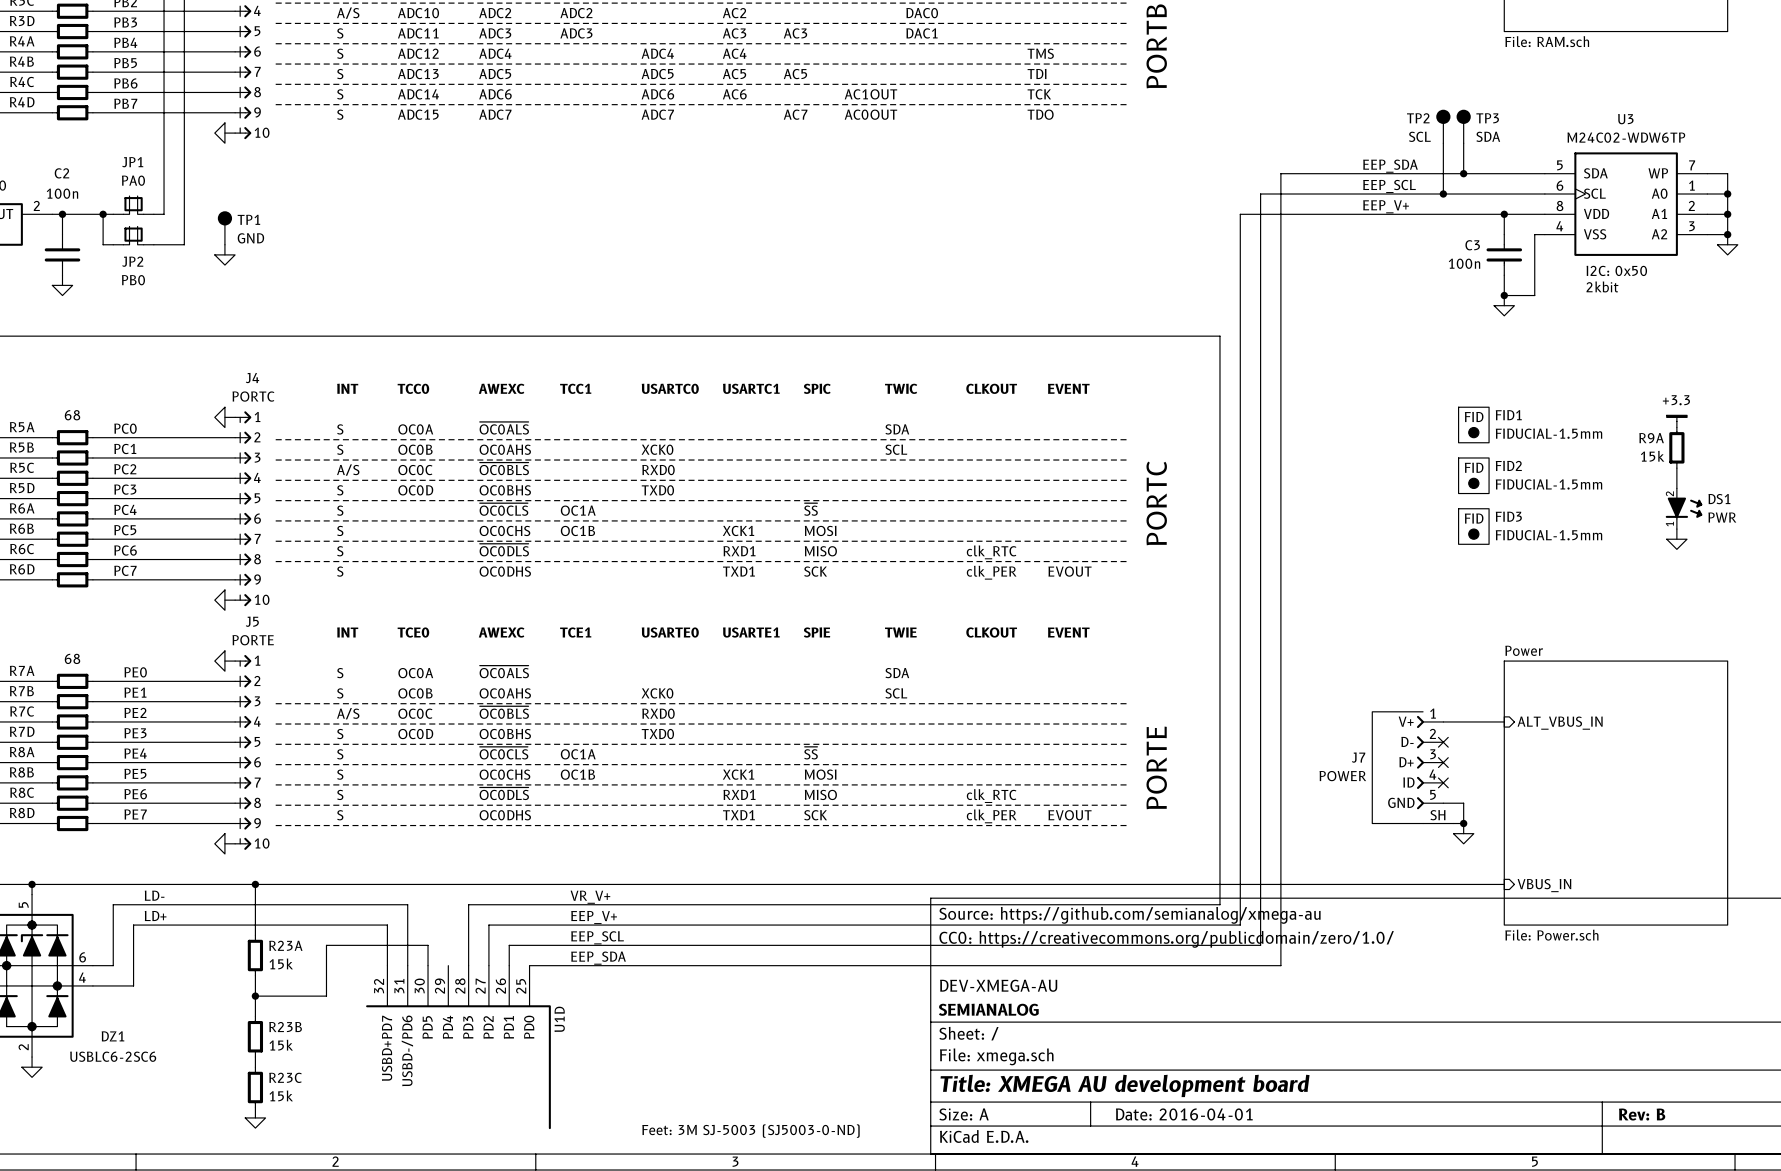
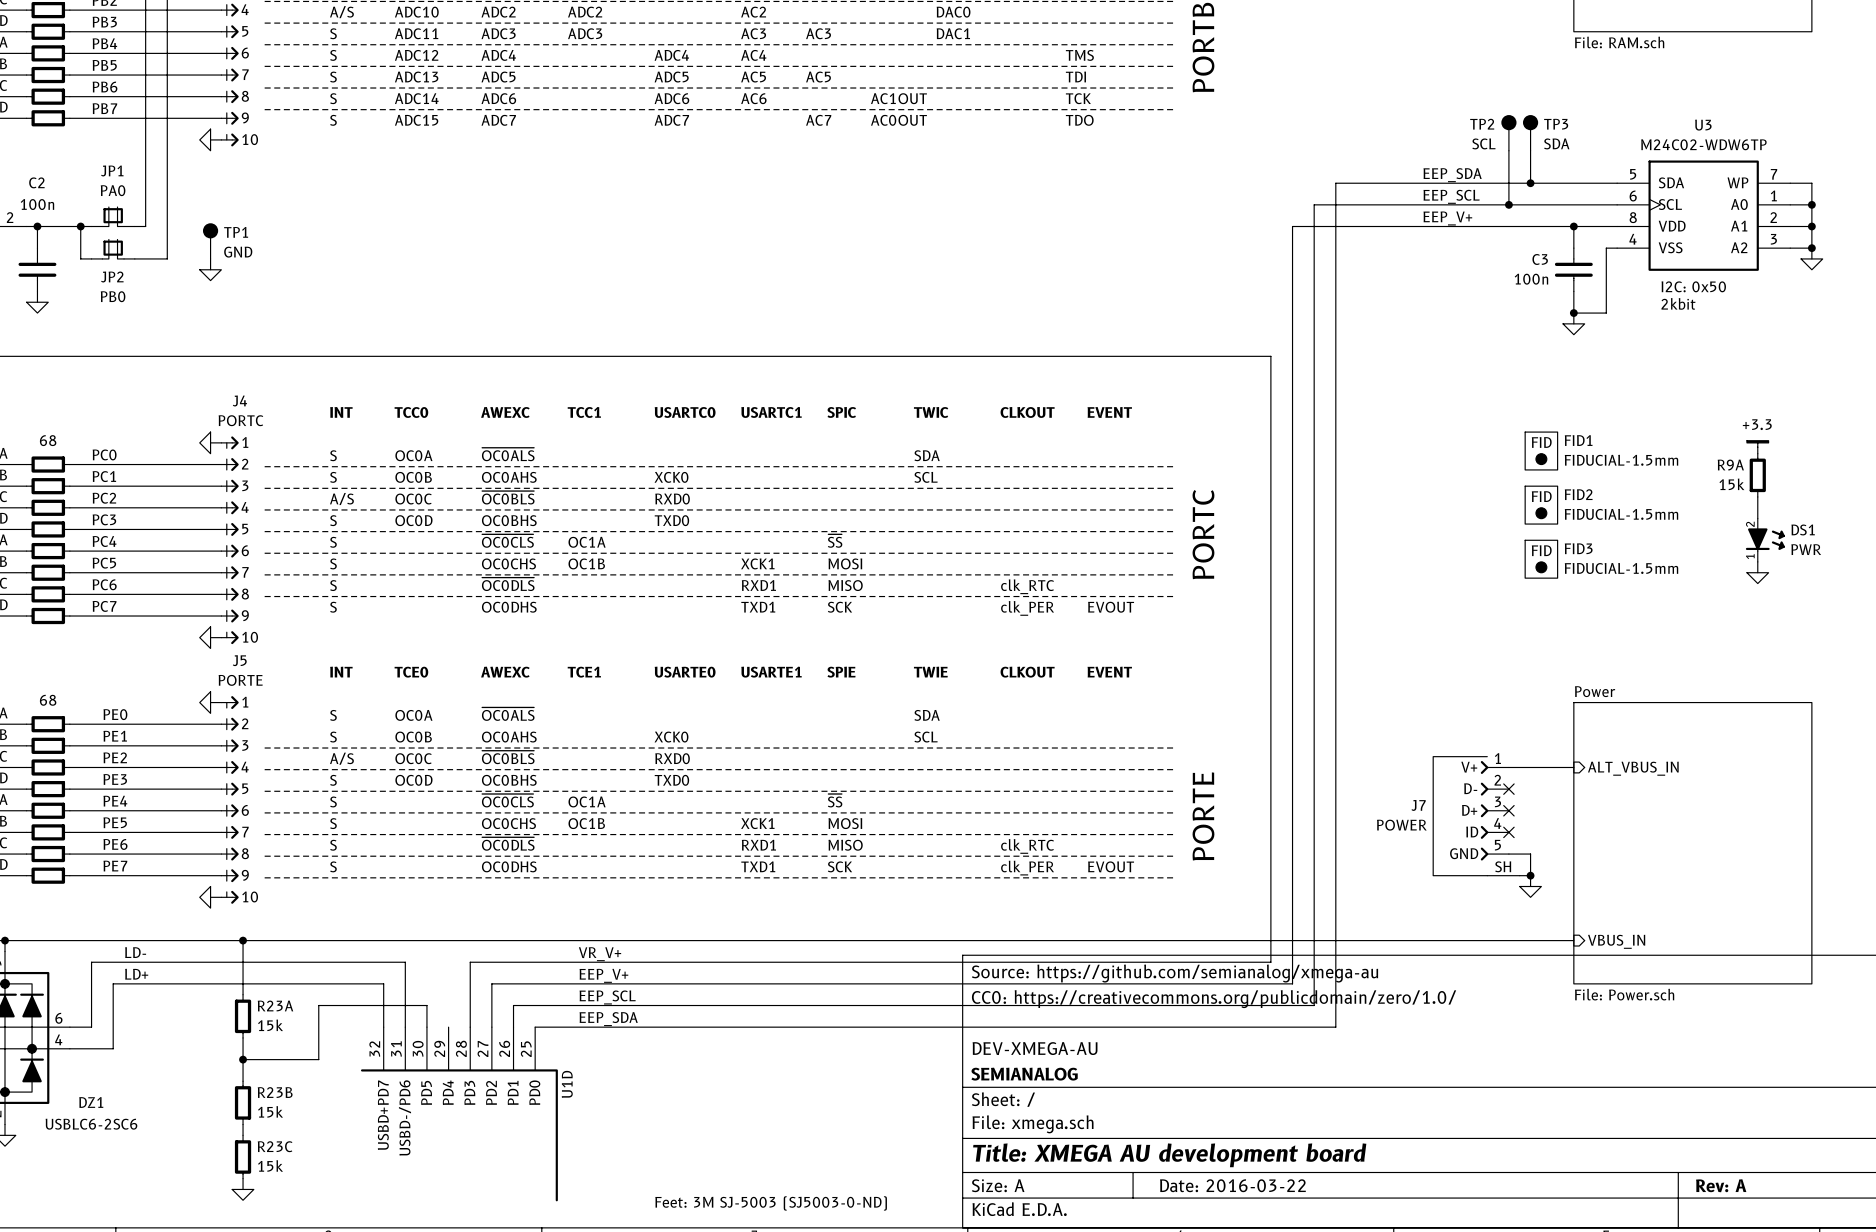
title block: Date: 2016-04-01 (1184, 1114) -> Date: 2016-03-22 (1232, 1185)
title block: Rev: B (1642, 1114) -> Rev: A (1721, 1185)

